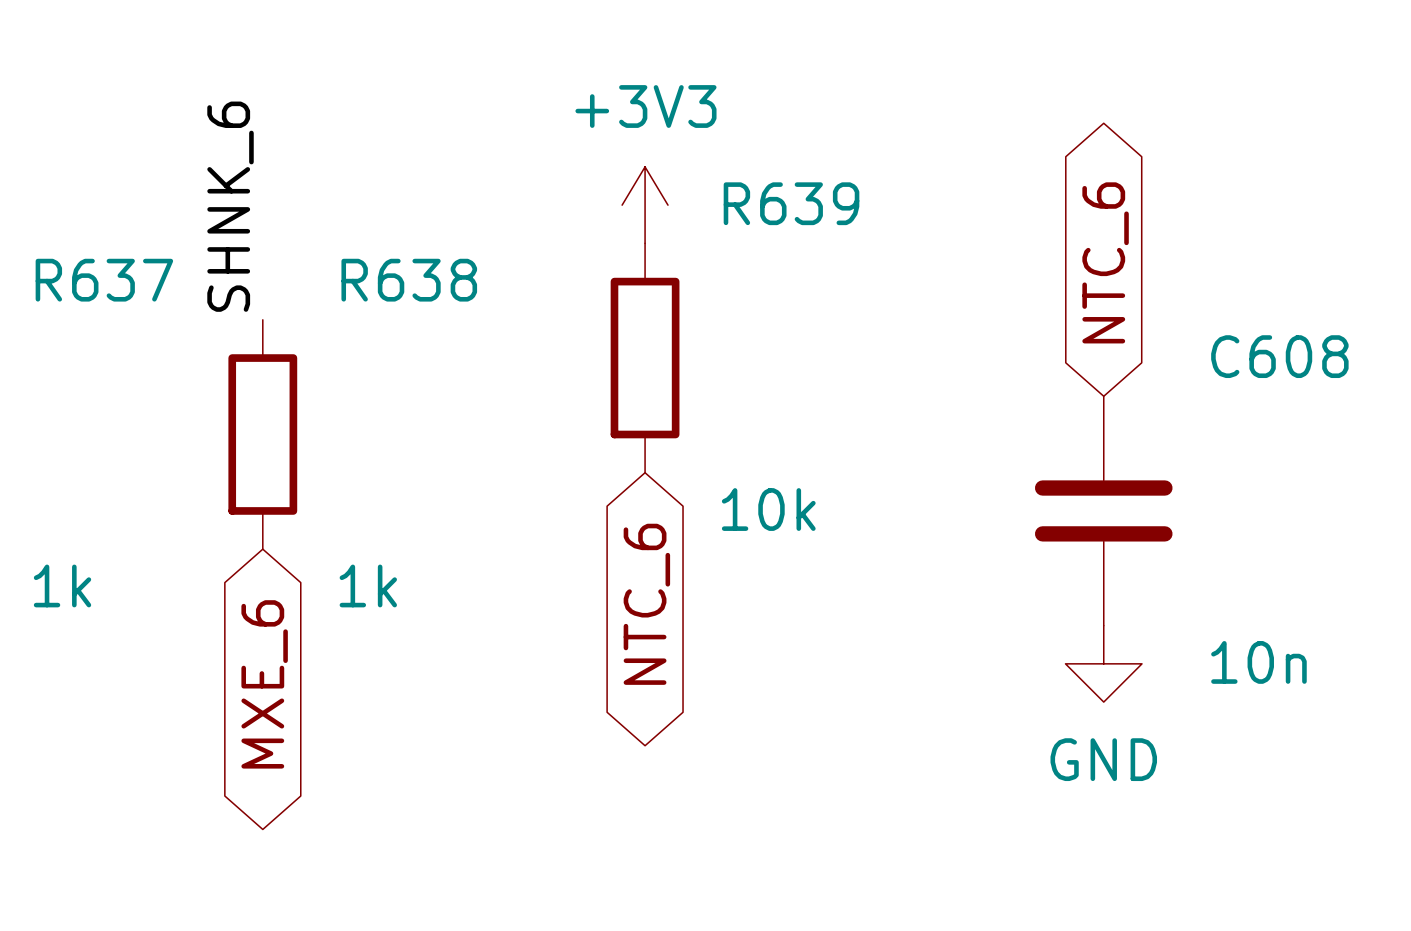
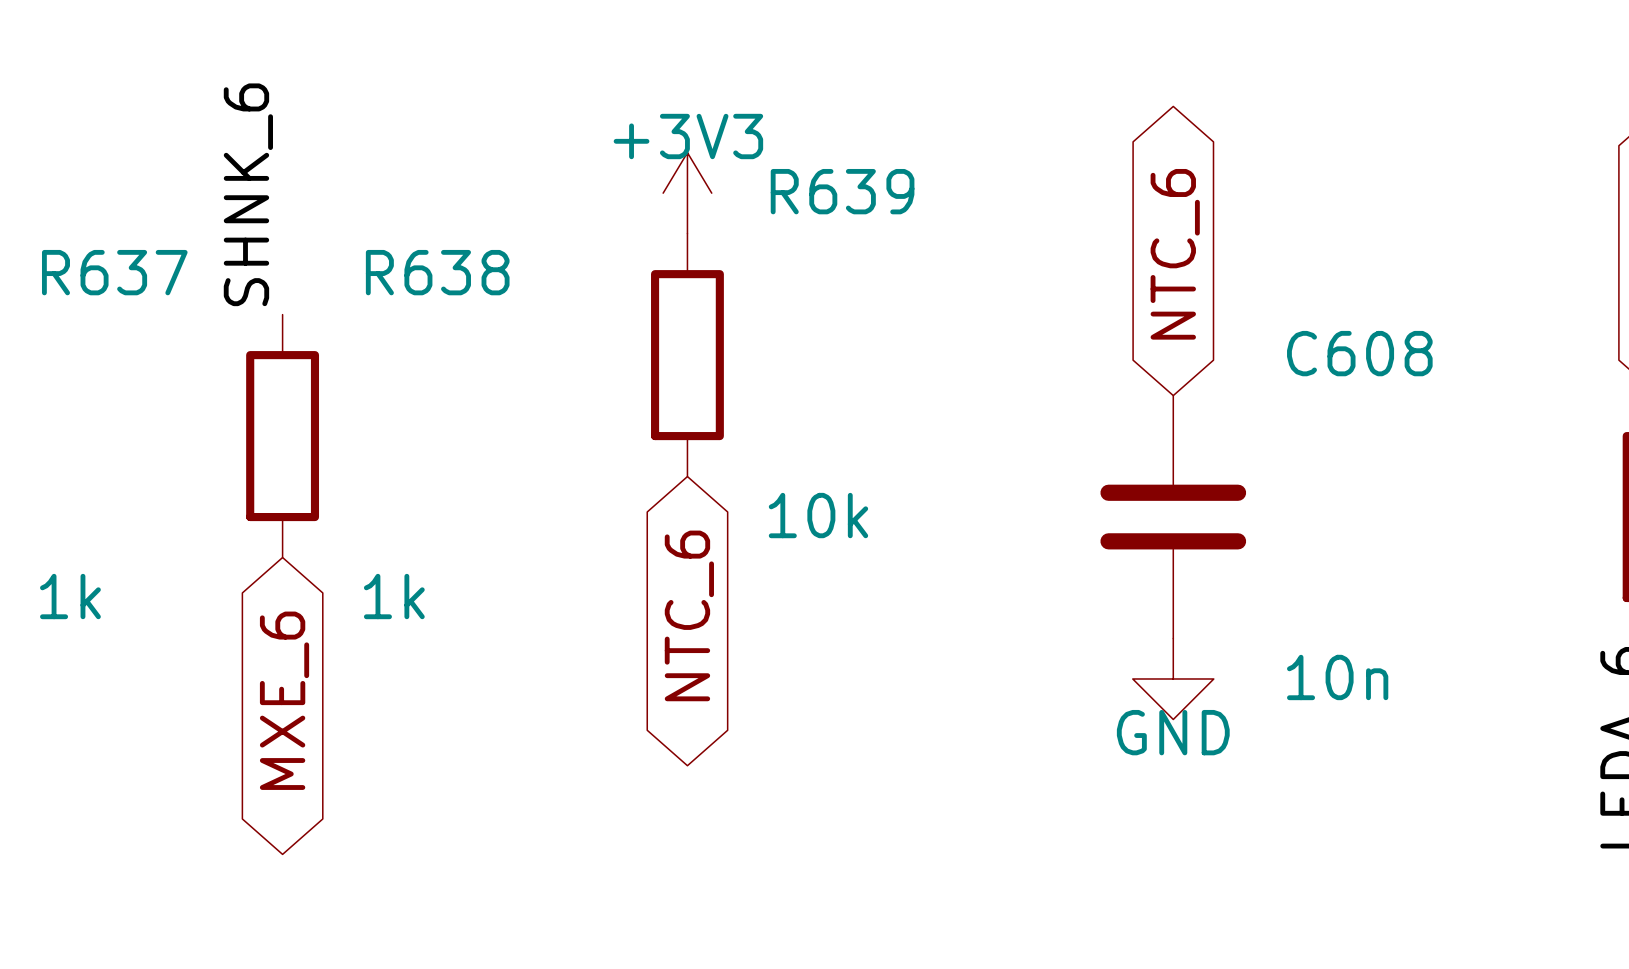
power symbol text position: +3V3 (645, 106) -> +3V3 (688, 136)
power symbol text position: GND (1103, 759) -> GND (1173, 732)

